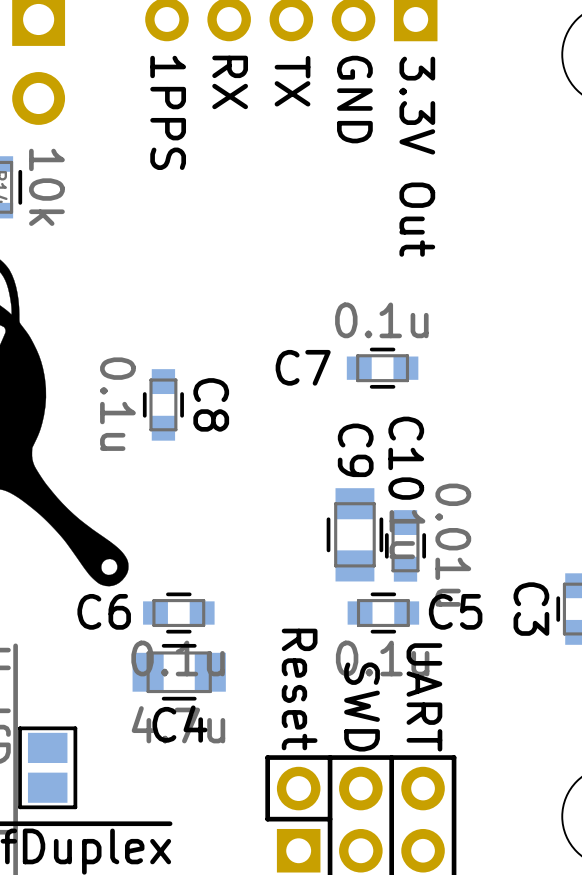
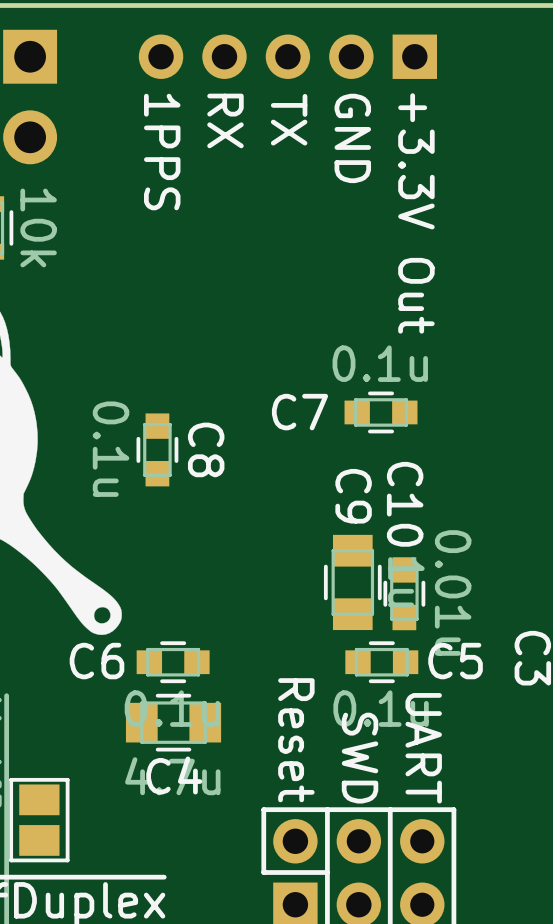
text: 3.3V Out (417, 156) -> +3.3V Out (416, 213)

